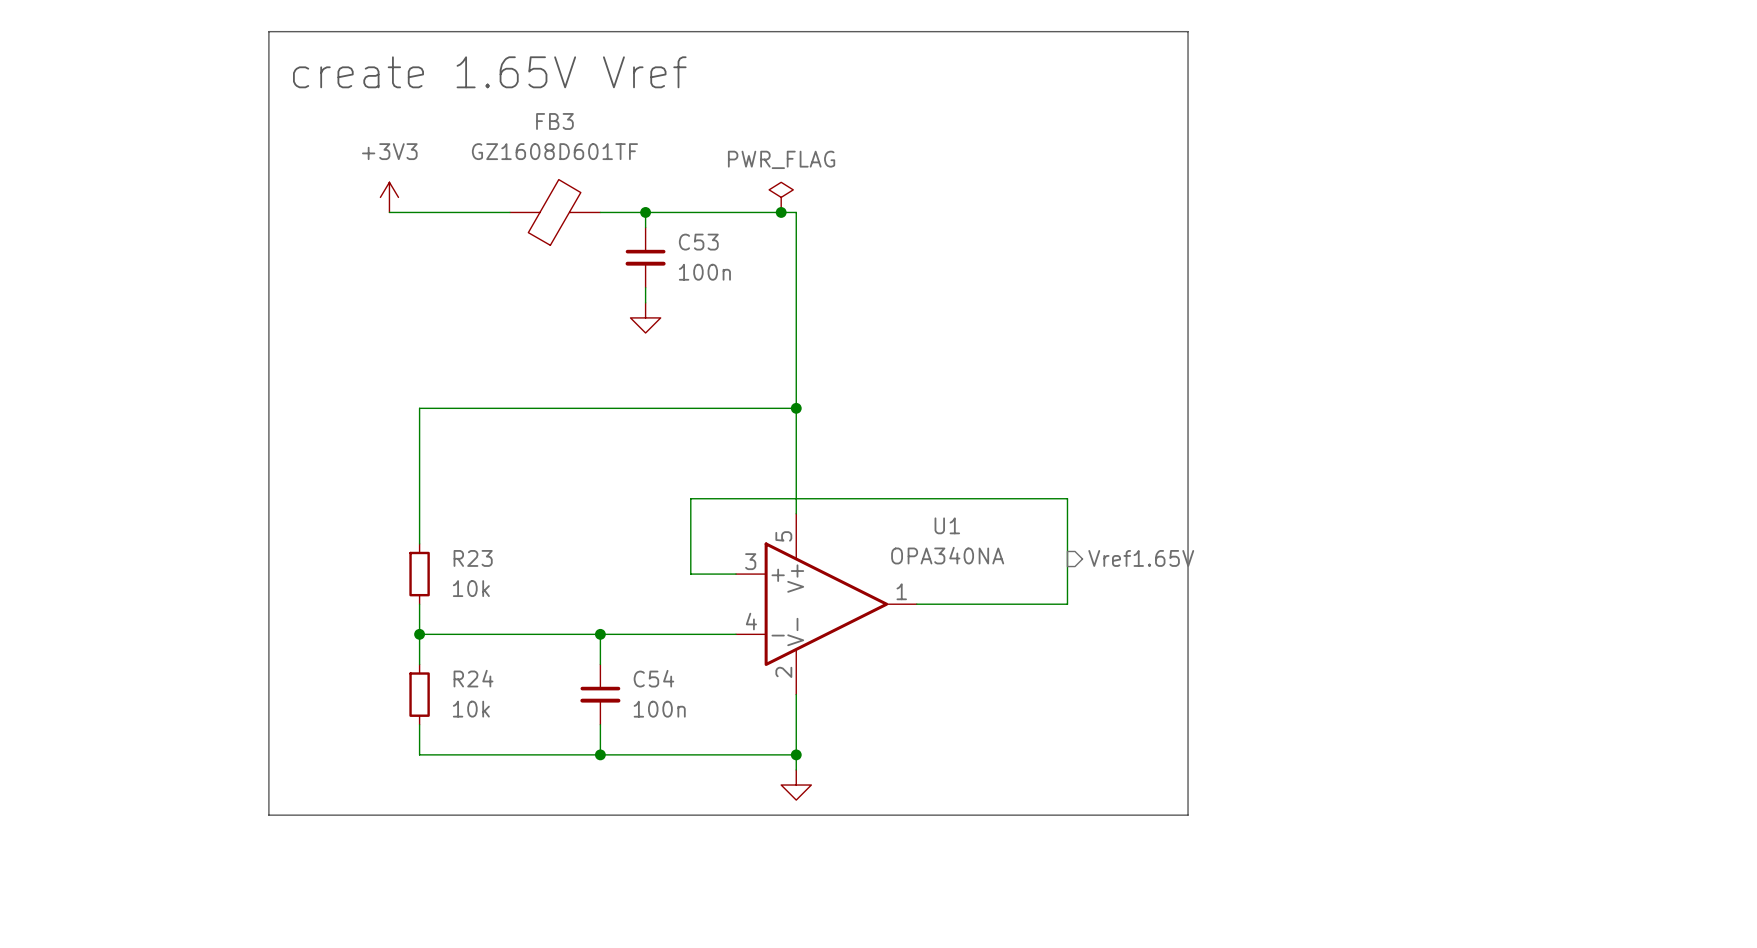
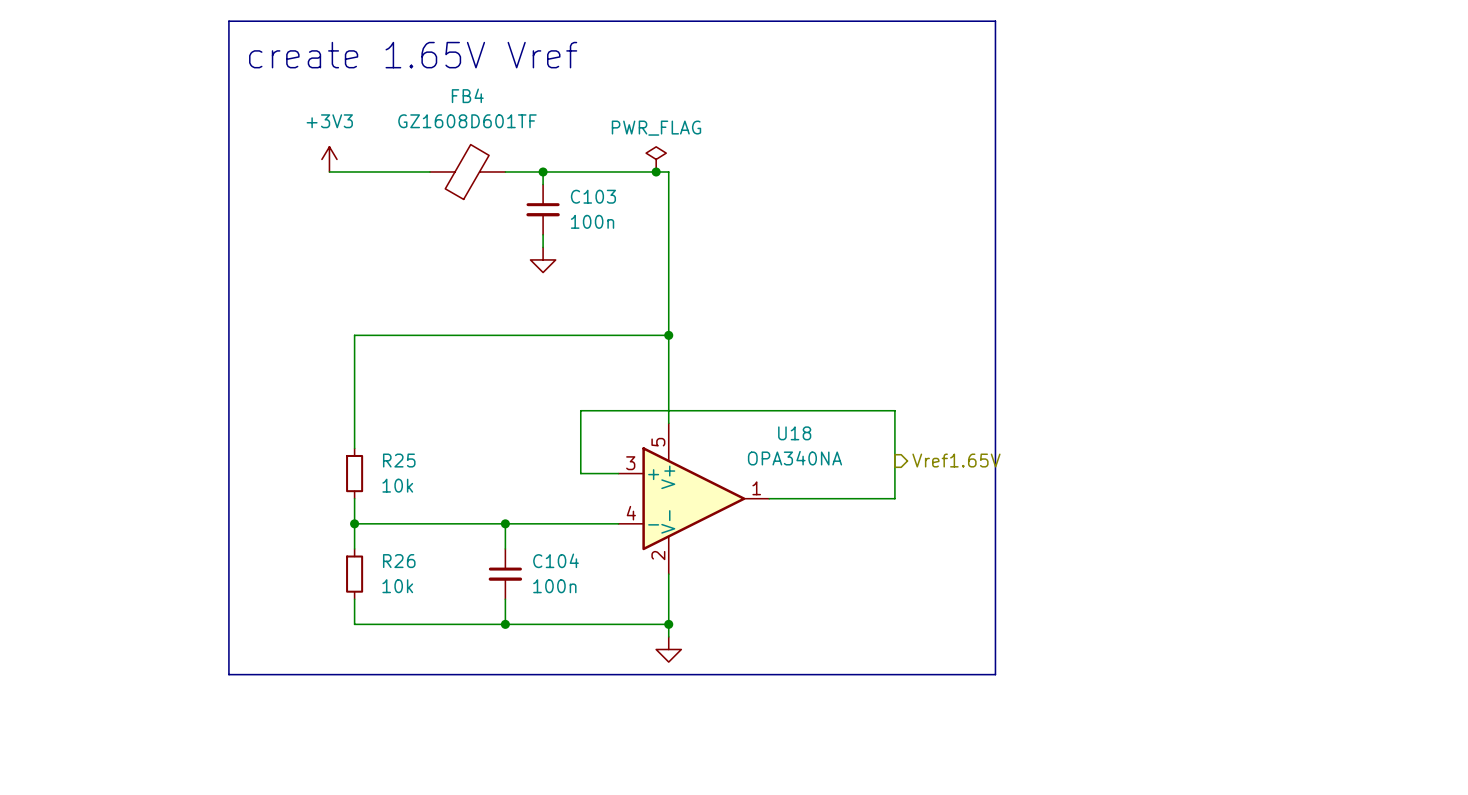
FB3 name: FB3 (554, 121) -> FB4 (467, 95)
C53 name: C53 (698, 242) -> C103 (593, 196)
U1 name: U1 (947, 525) -> U18 (794, 433)
R23 name: R23 (473, 558) -> R25 (399, 460)
R24 name: R24 (473, 678) -> R26 (399, 561)
C54 name: C54 (653, 678) -> C104 (556, 560)

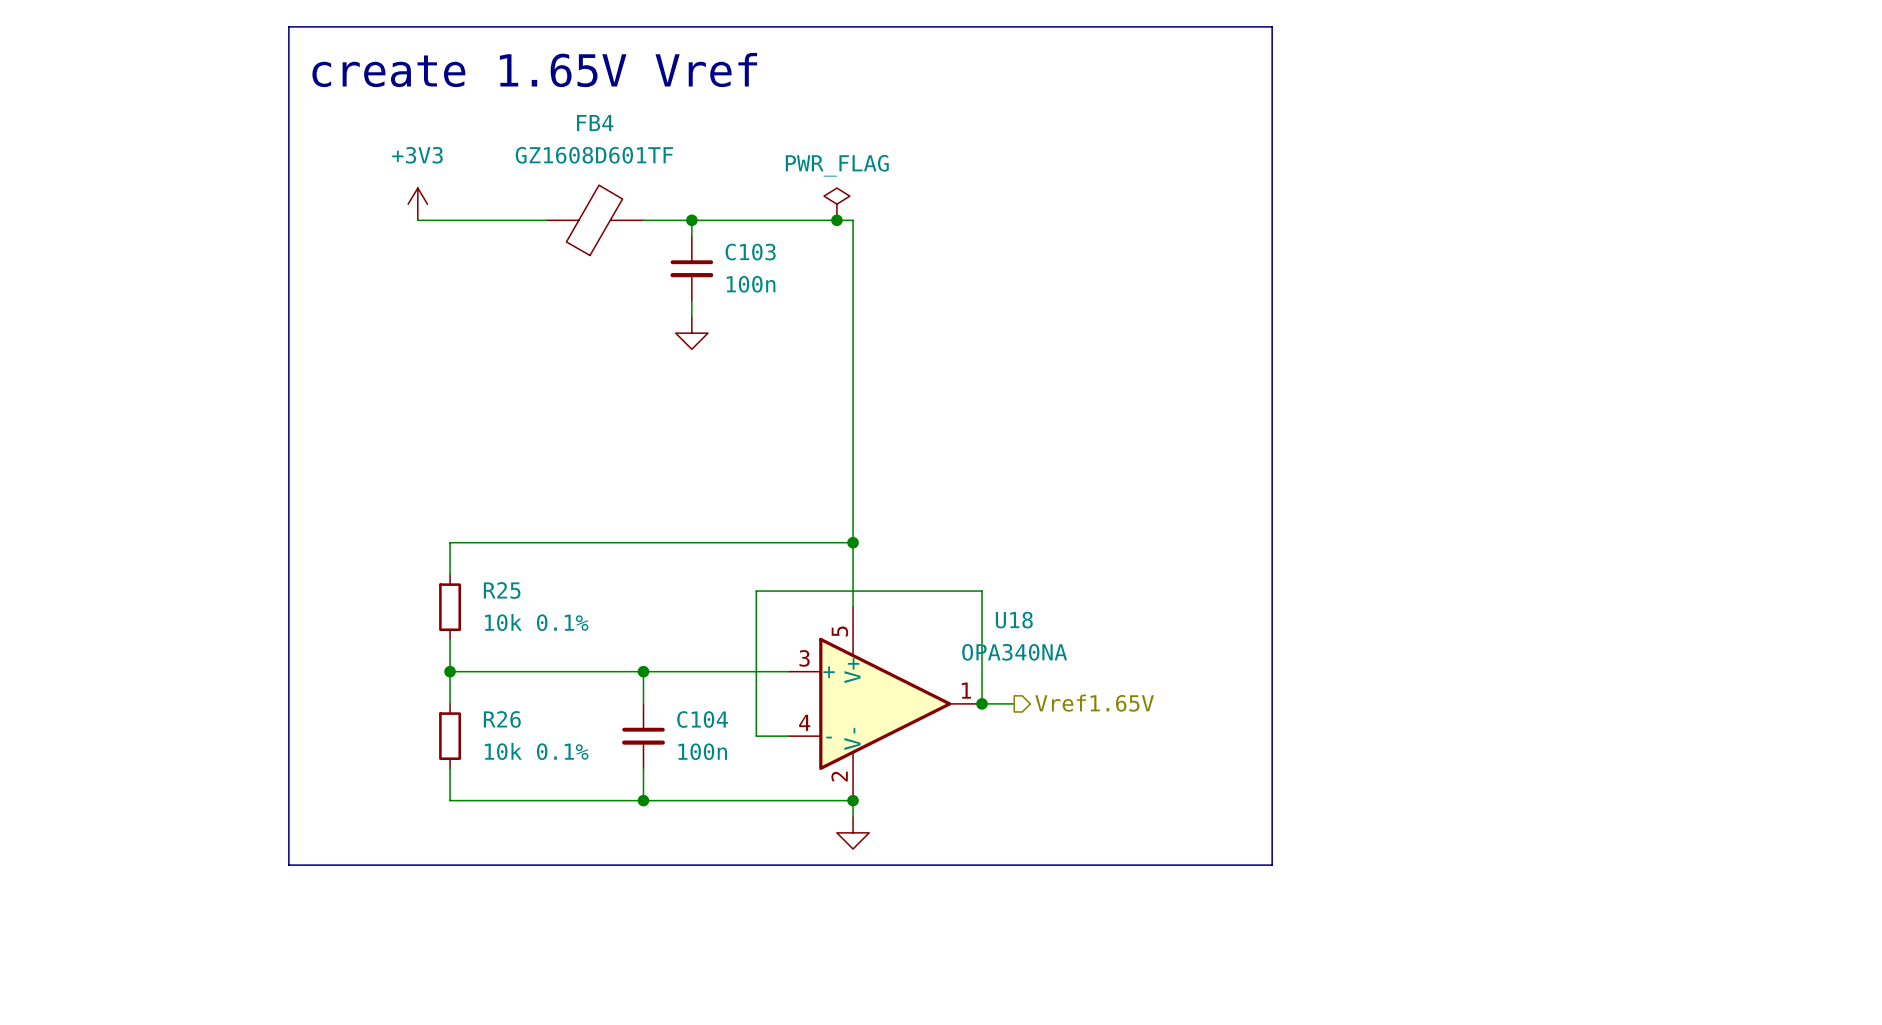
wire: (668, 335) (354, 335) (354, 423) -> (853, 607) (853, 542) (450, 542)
junction: (668, 335) -> none
junction: none -> (853, 542)
hierarchical label position: Vref1.65V (956, 460) -> Vref1.65V (1094, 703)
wire: (618, 473) (580, 473) (580, 410) (894, 410) (894, 498) (769, 498) -> none
R25 value: 10k (397, 485) -> 10k 0.1% (536, 622)
U18 position: (693, 498) -> (885, 703)
junction: none -> (982, 703)
wire: none -> (1014, 703) (982, 703) (982, 591) (756, 591) (756, 736) (788, 736)
R26 value: 10k (397, 586) -> 10k 0.1% (536, 751)

